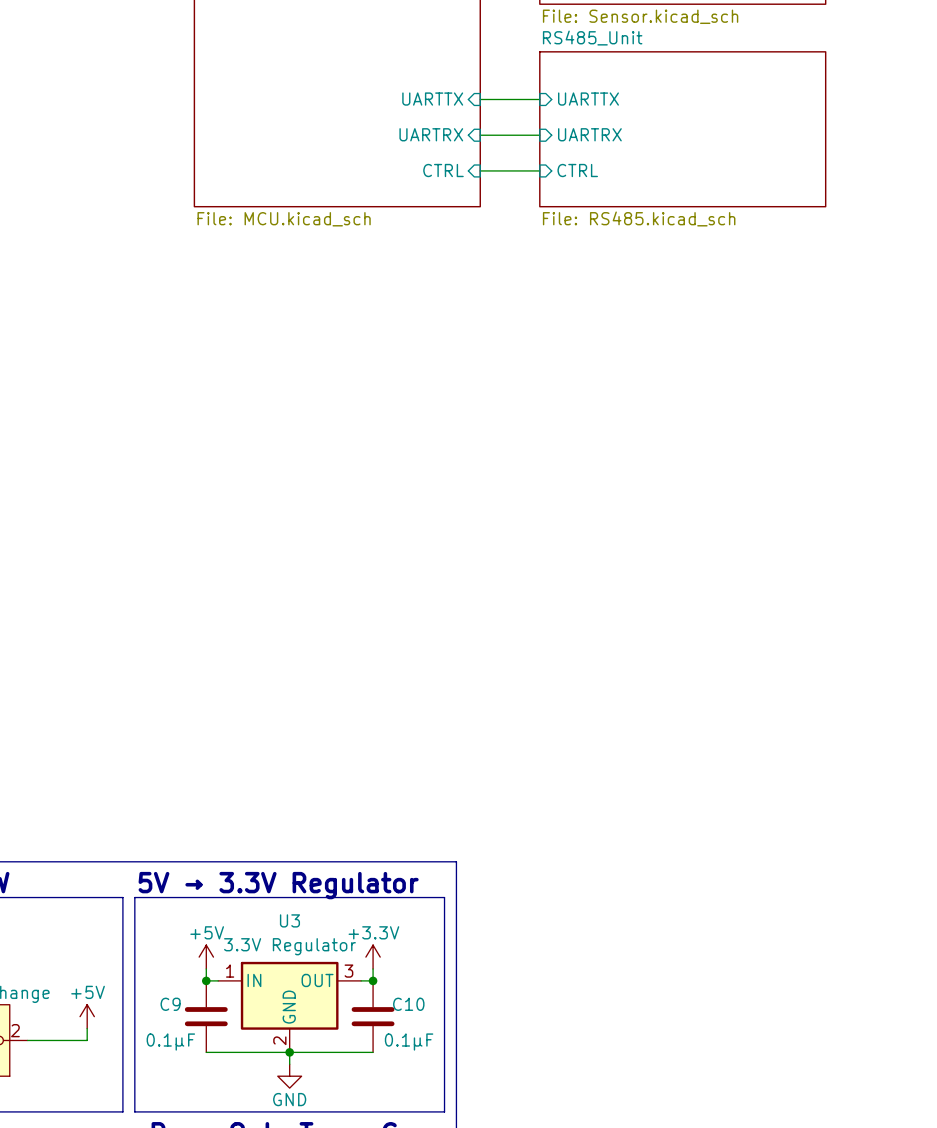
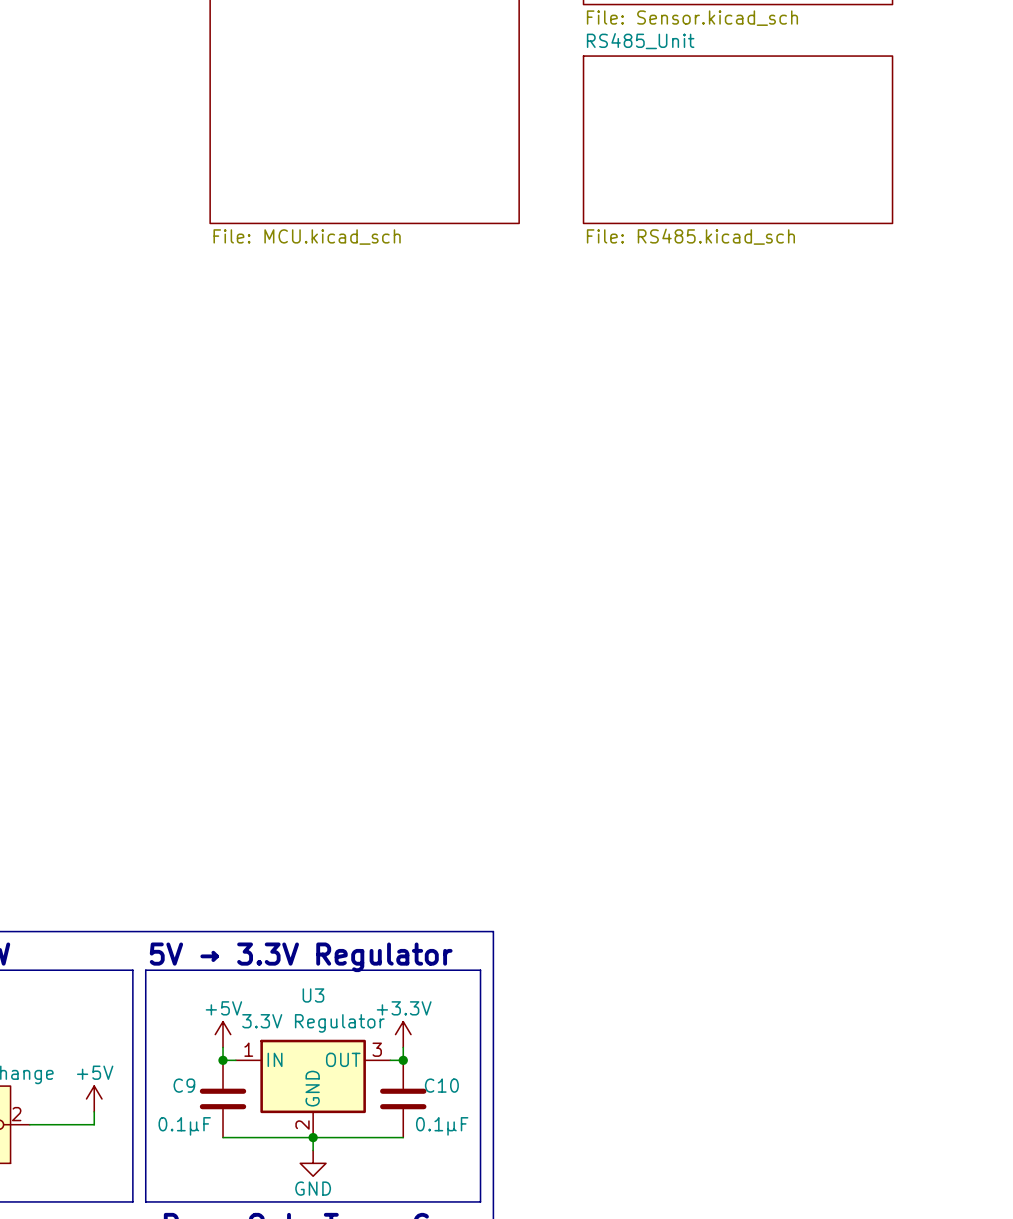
sheet pin: UARTTX (432, 99) -> none
wire: (480, 99) (539, 99) -> none
sheet pin: UARTTX (588, 99) -> none
sheet pin: UARTRX (431, 134) -> none
sheet pin: UARTRX (589, 134) -> none
wire: (480, 135) (539, 135) -> none
sheet pin: CTRL (443, 170) -> none
wire: (480, 170) (539, 170) -> none
sheet pin: CTRL (577, 170) -> none

